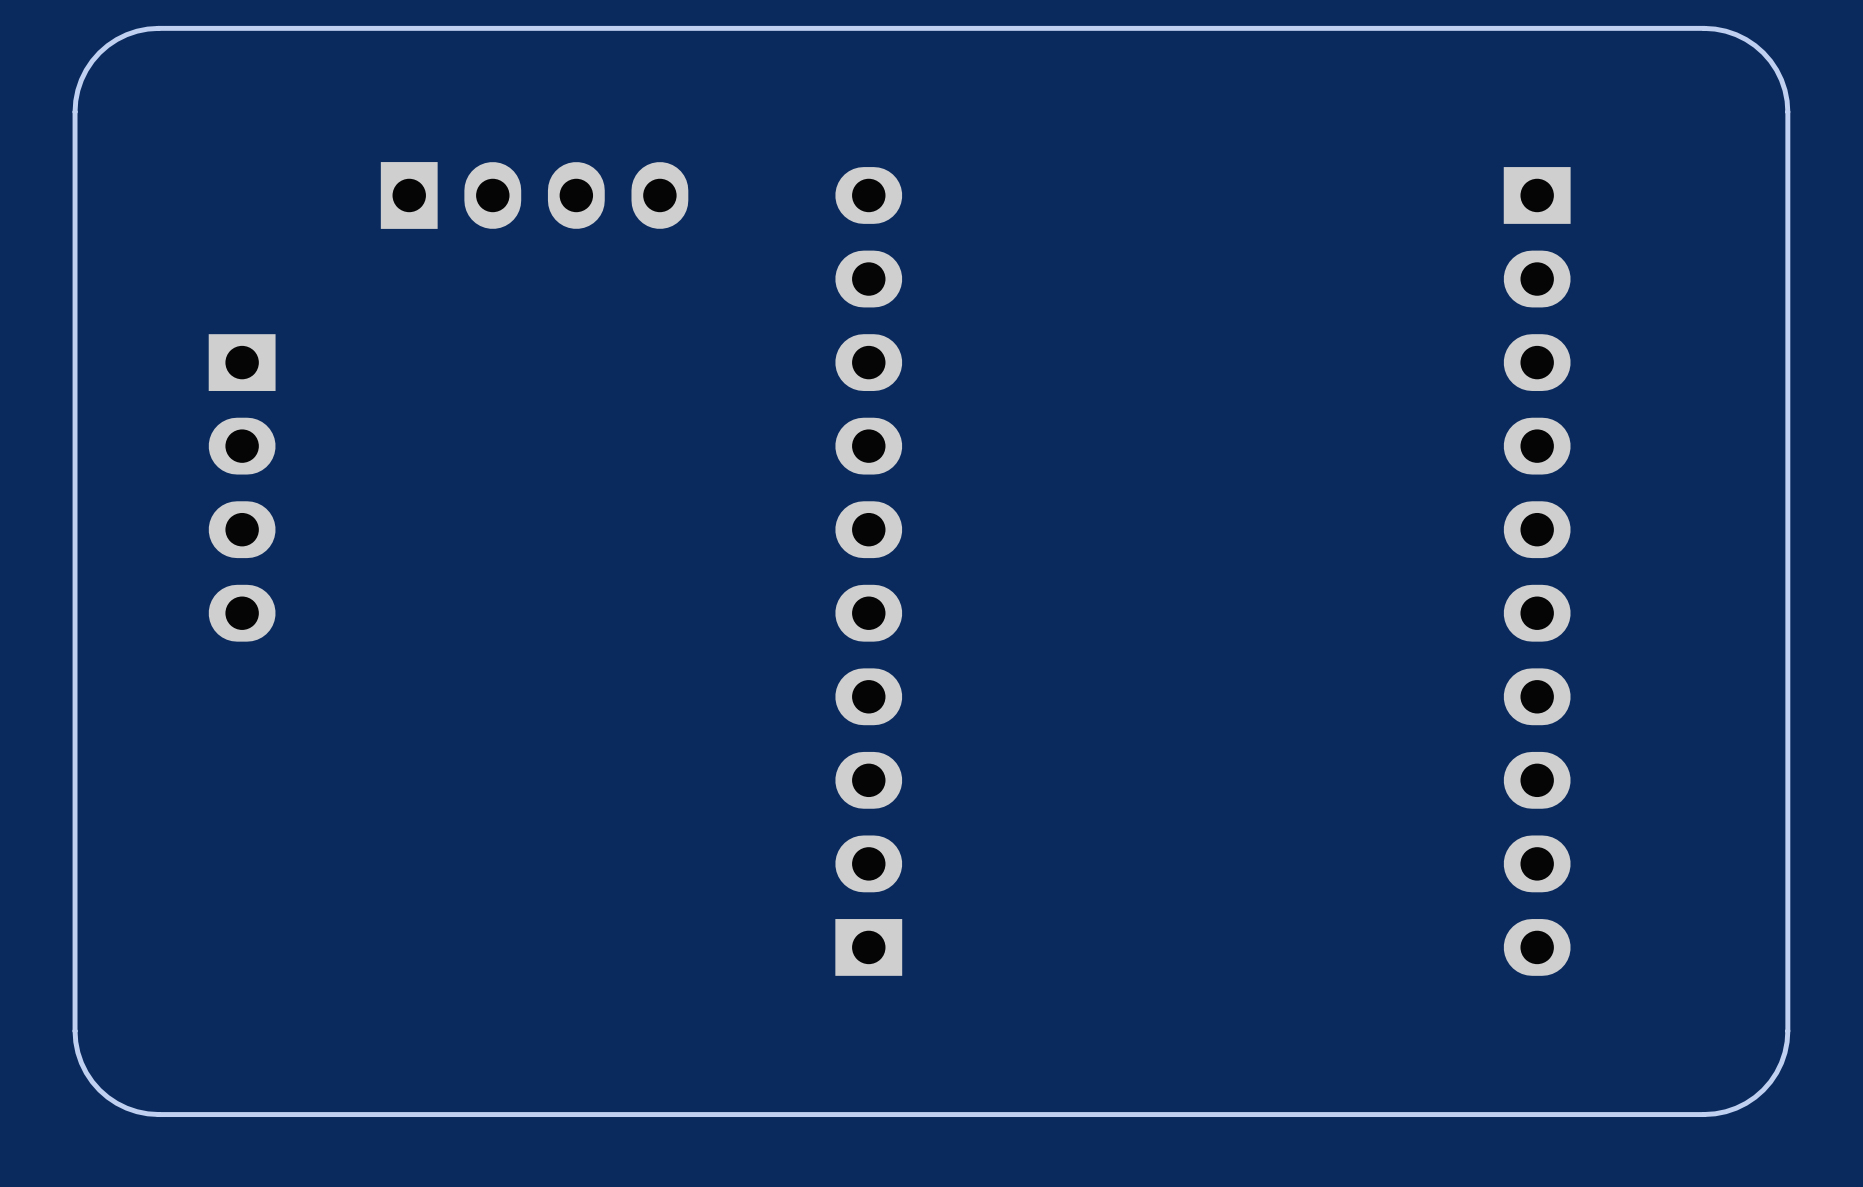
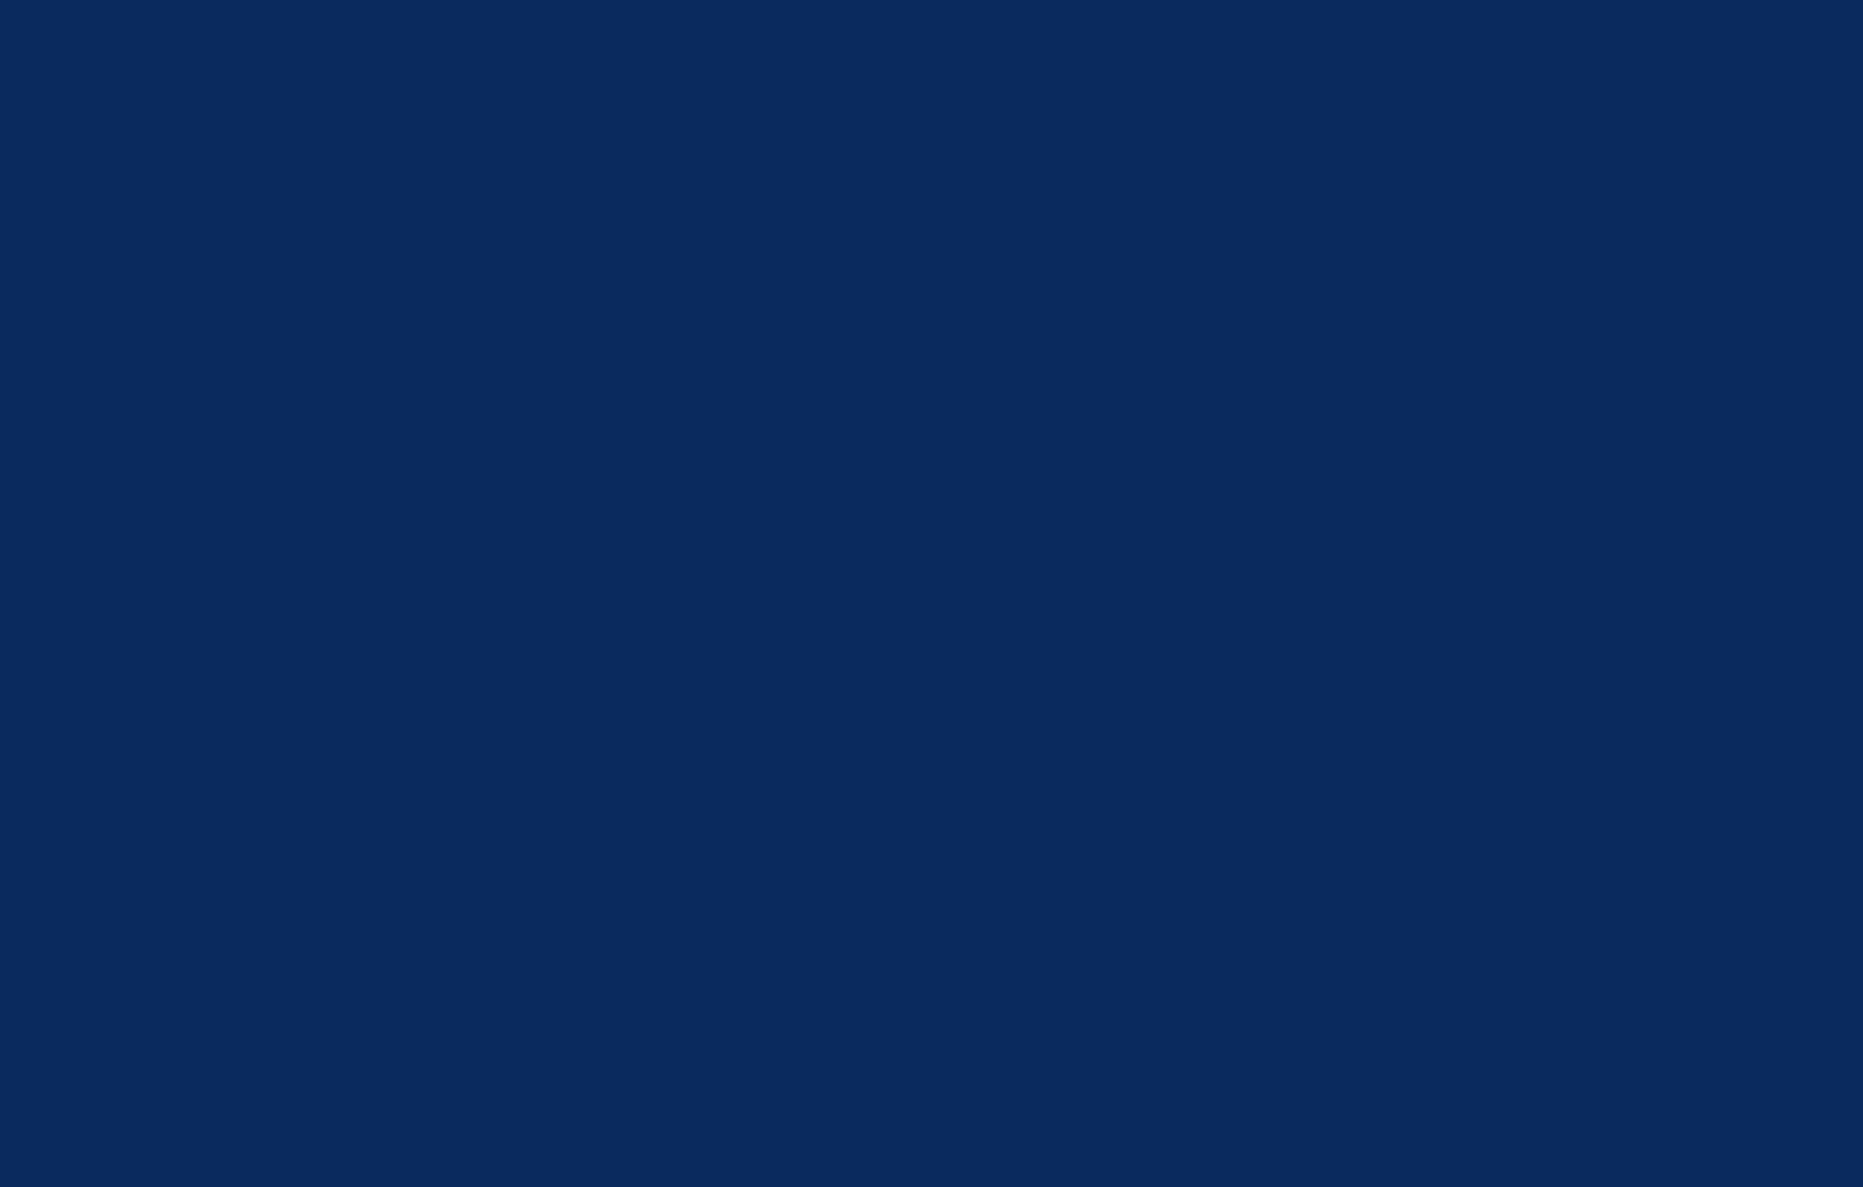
board edge: (1704, 28) (158, 28) (136, 31) (116, 39) (99, 52) (86, 70) (77, 90) (75, 111) (75, 1030) (77, 1052) (86, 1072) (99, 1090) (116, 1103) (136, 1111) (158, 1114) (1704, 1114) (1725, 1111) (1746, 1103) (1763, 1090) (1776, 1072) (1784, 1052) (1787, 1030) (1787, 111) (1781, 79) (1763, 52) (1736, 34) (1704, 28) -> none
part: (534, 195) -> none
part: (242, 487) -> none
part: (868, 571) -> none
part: (1537, 571) -> none

